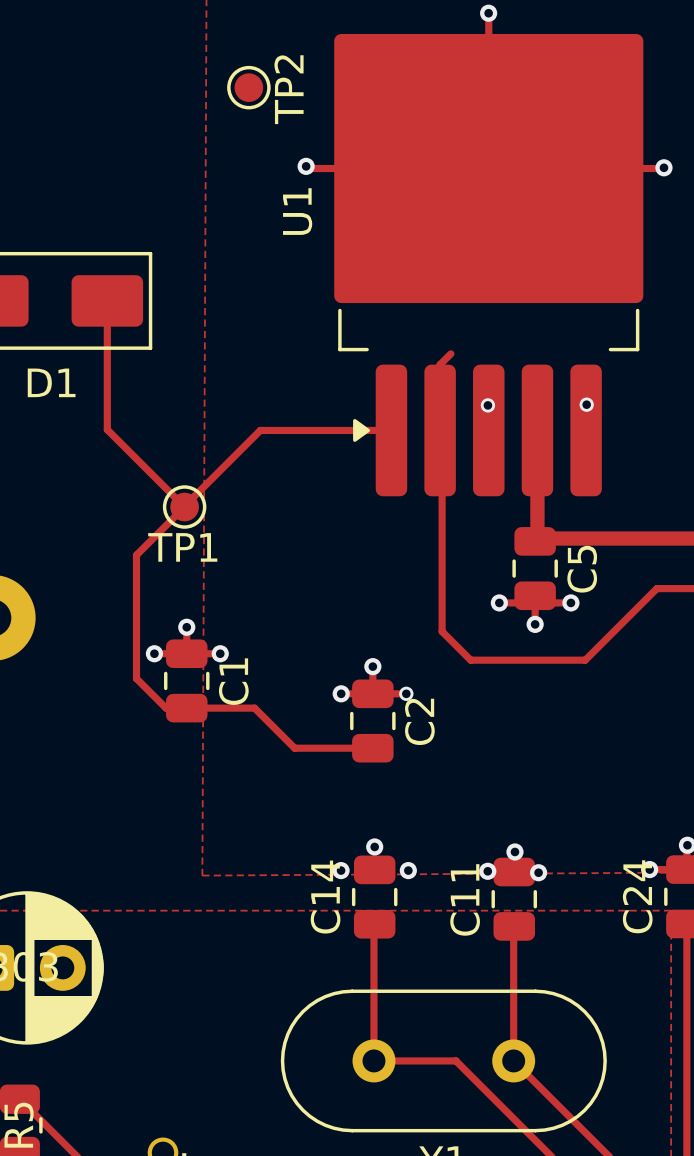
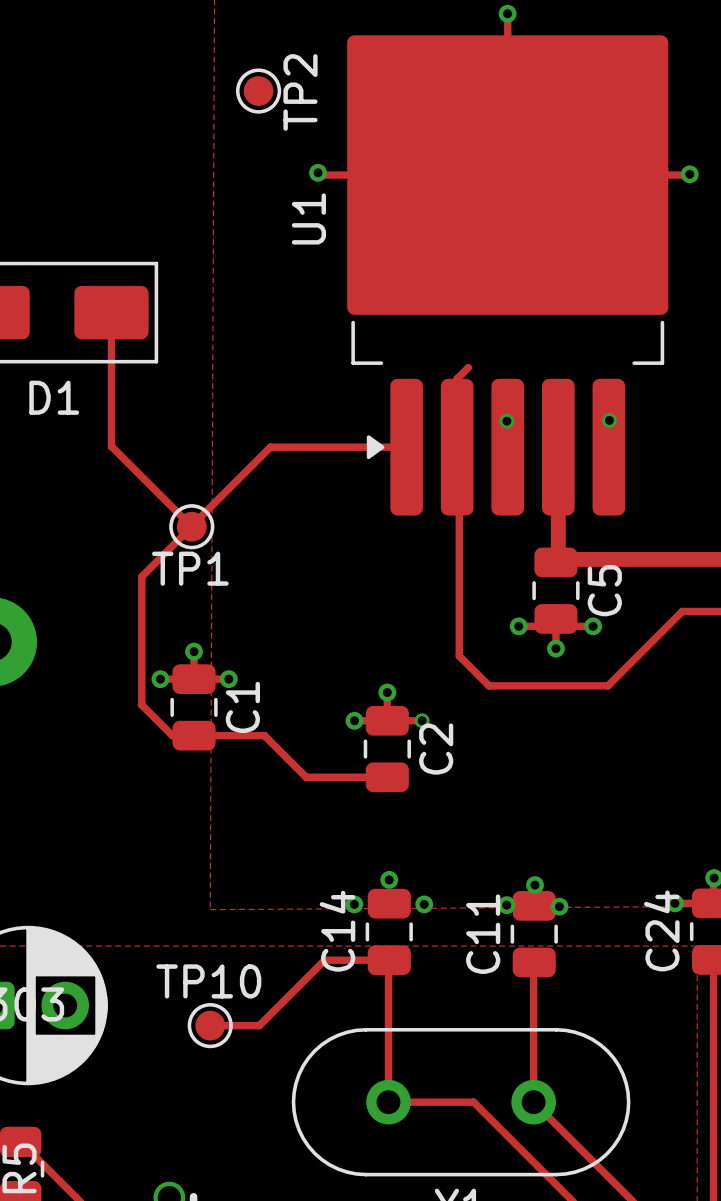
top track: none -> (389, 960) (324, 960) (259, 1025) (210, 1025)
TP10: none -> (210, 1025)

